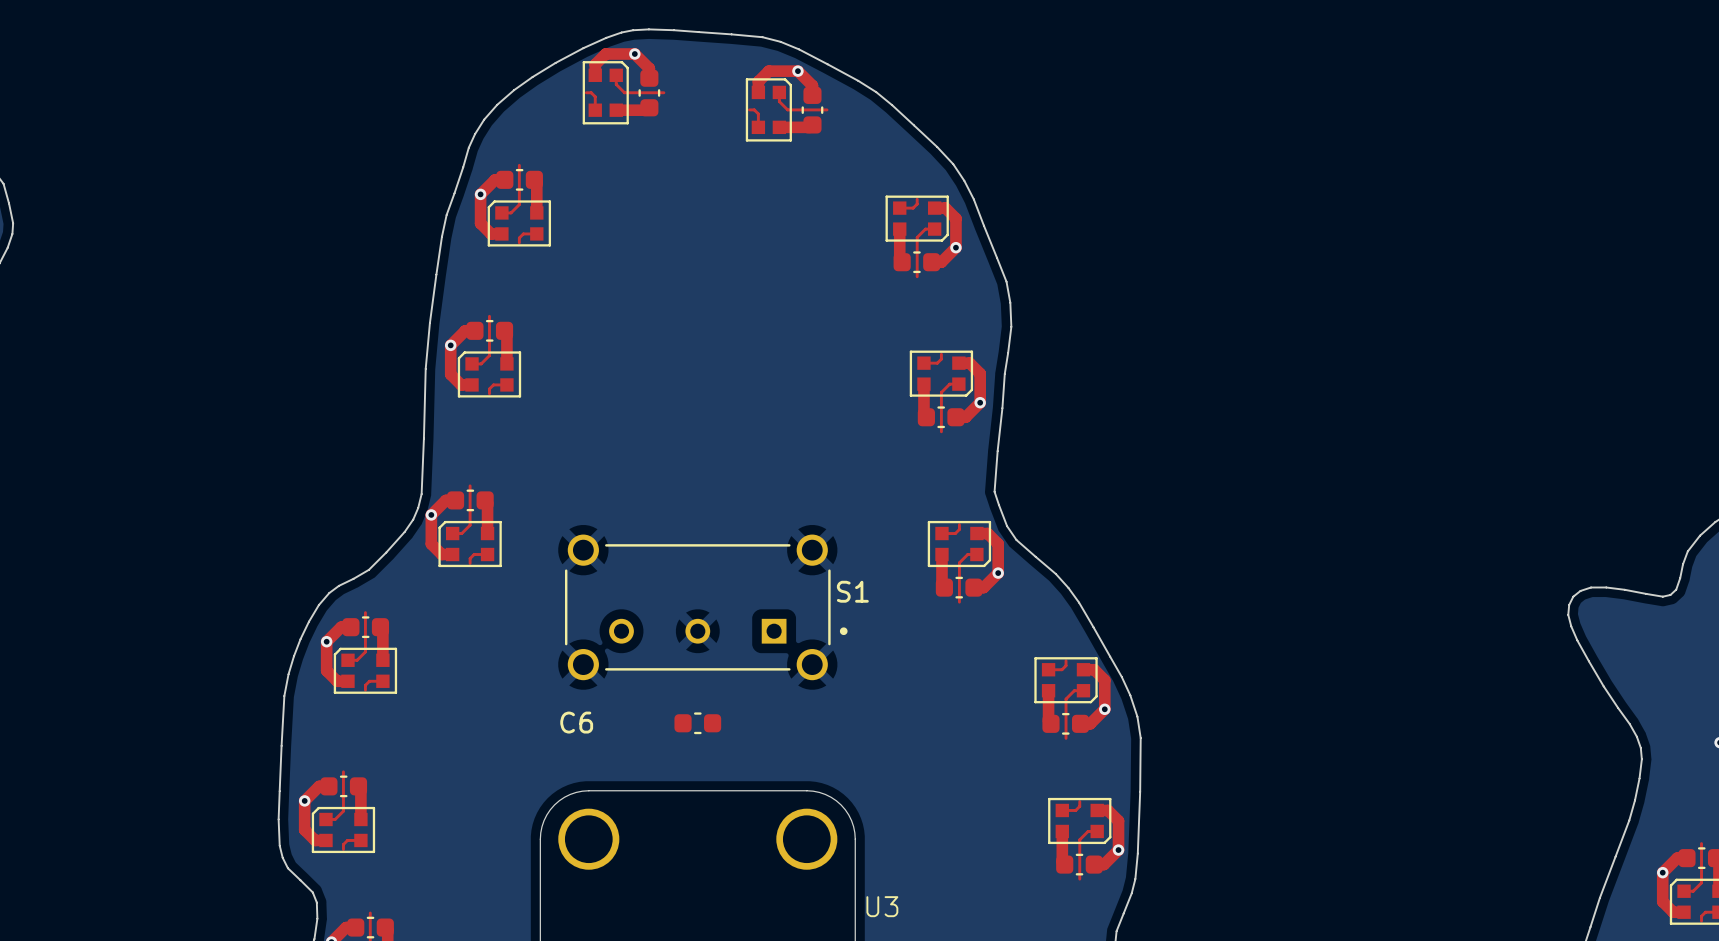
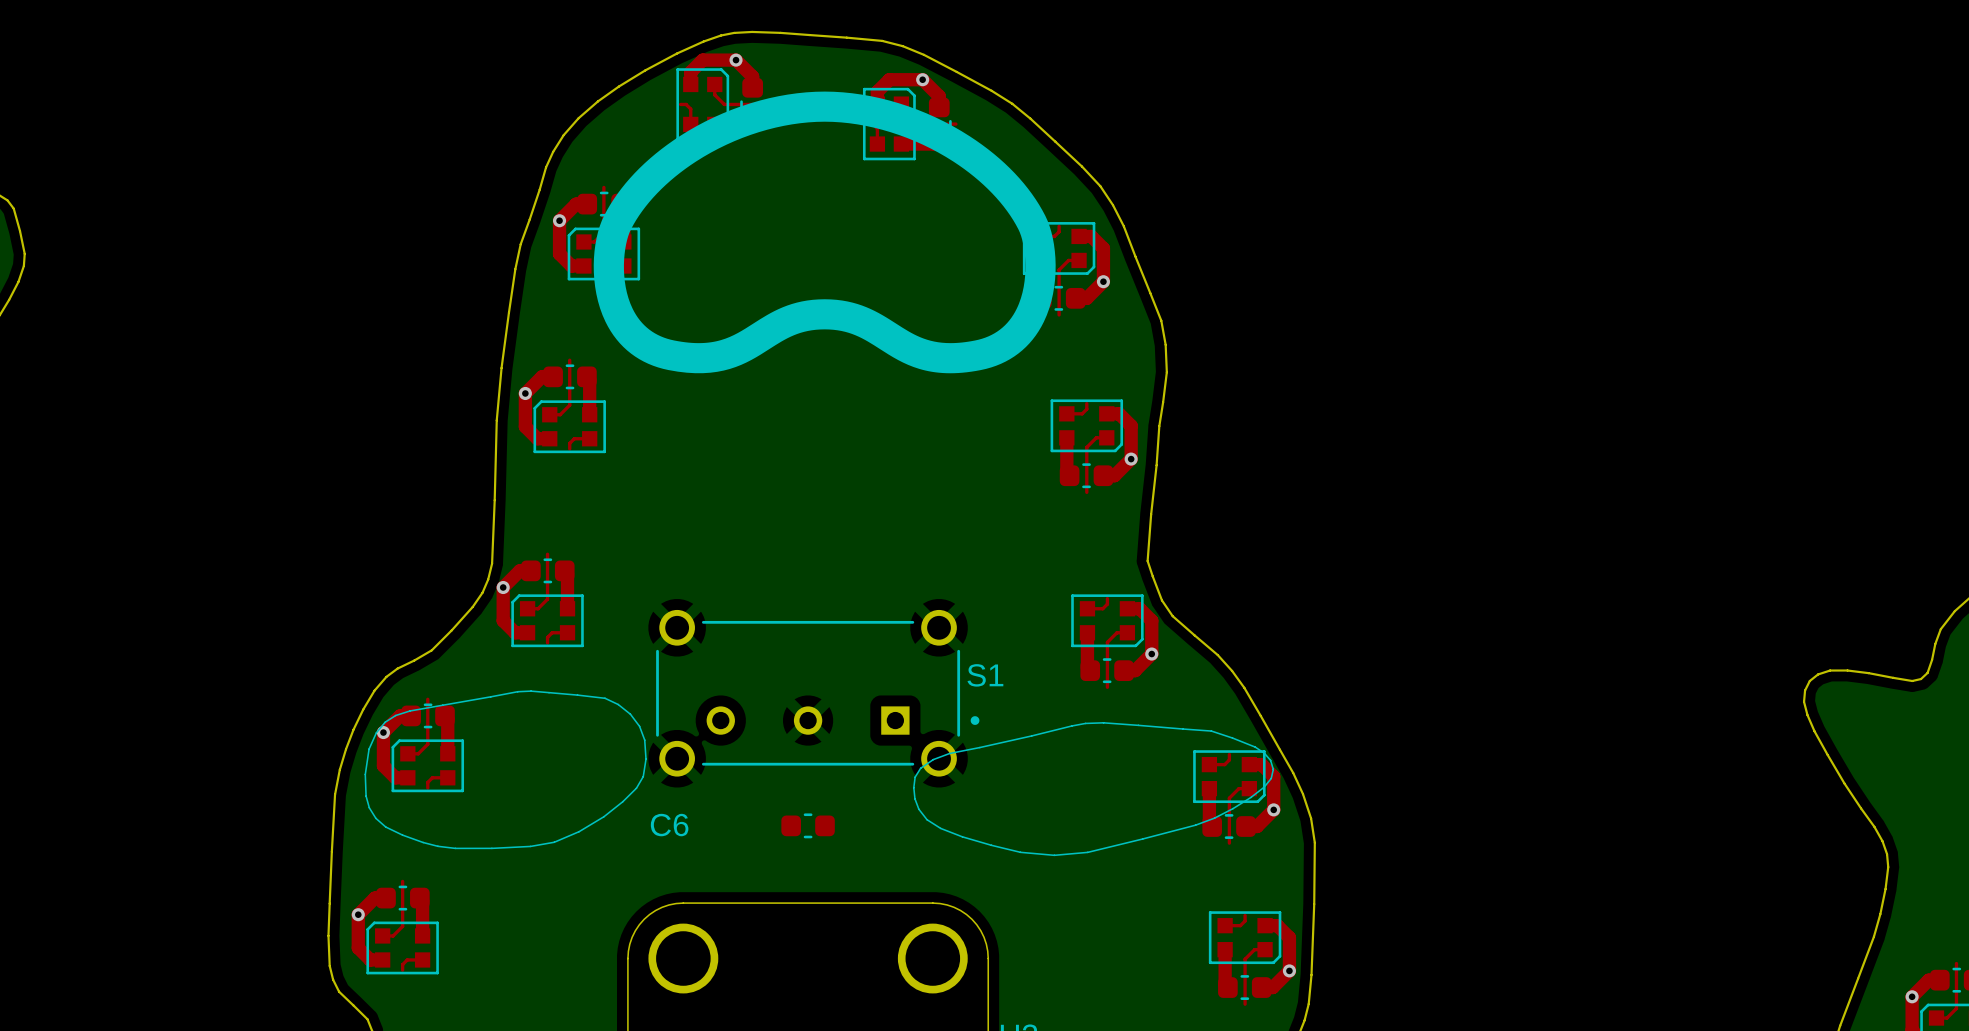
drawing: none -> [593, 91, 1056, 374]
line: none -> (531, 691) (605, 698) (618, 704) (630, 714) (639, 726) (644, 740) (646, 759) (643, 776) (636, 788) (622, 801) (603, 816) (579, 831) (554, 842) (530, 846) (455, 848) (437, 846) (402, 835) (385, 827) (375, 818) (369, 807) (366, 796) (365, 774) (369, 749) (376, 732) (385, 722) (395, 715) (409, 710) (517, 691) (531, 691)
line: none -> (1103, 722) (1071, 725) (949, 753) (933, 759) (920, 768) (915, 777) (914, 798) (918, 809) (926, 819) (940, 828) (962, 836) (1020, 852) (1054, 855) (1087, 852) (1195, 825) (1233, 808) (1264, 787) (1271, 778) (1273, 769) (1270, 760) (1264, 753) (1255, 747) (1232, 738) (1211, 731) (1103, 722)

